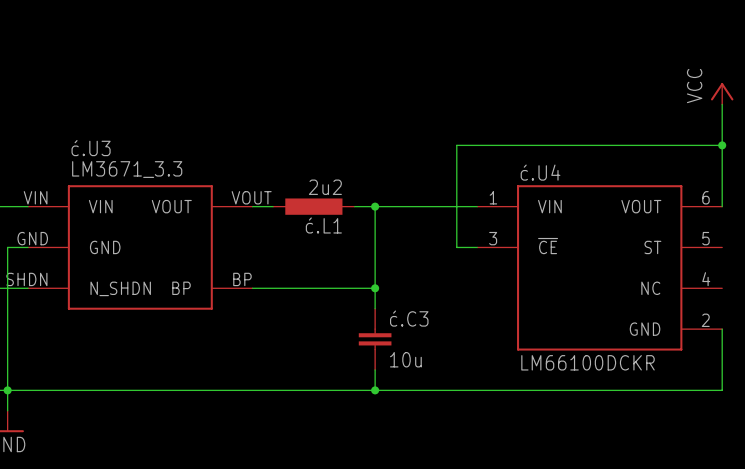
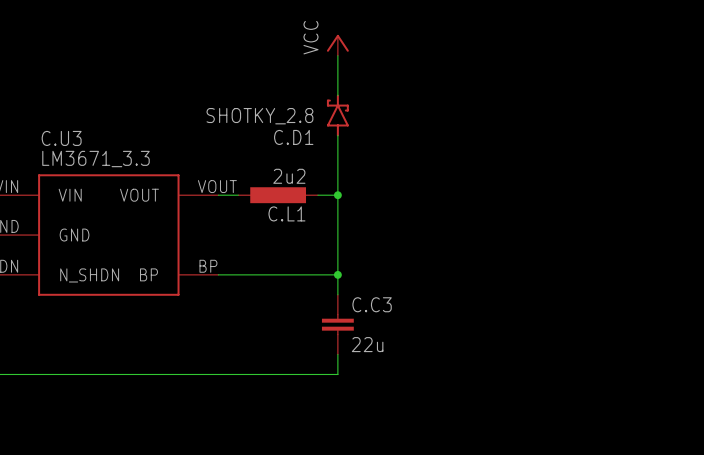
power symbol: none -> VCC (337, 45)
wire: none -> (337, 55) (337, 95)
power symbol: VCC (722, 93) -> none
wire: (722, 104) (722, 206) -> none
C.D1: none -> SHOTKY_2.8 (337, 115)
wire: (722, 145) (456, 145) (456, 247) (477, 247) -> none
junction: (722, 145) -> none
ć.U3 name: ć.U3 (91, 148) -> C.U3 (61, 138)
wire: (375, 206) (477, 206) -> (337, 195) (337, 135)
ć.L1 name: ć.L1 (323, 225) -> C.L1 (286, 213)
ć.U4: LM66100DCKR (599, 267) -> none
ć.C3 name: ć.C3 (409, 318) -> C.C3 (372, 304)
wire: (722, 329) (722, 390) (375, 390) -> none
ć.C3 value: 10u (405, 359) -> 22u (367, 344)
junction: (375, 390) -> none

